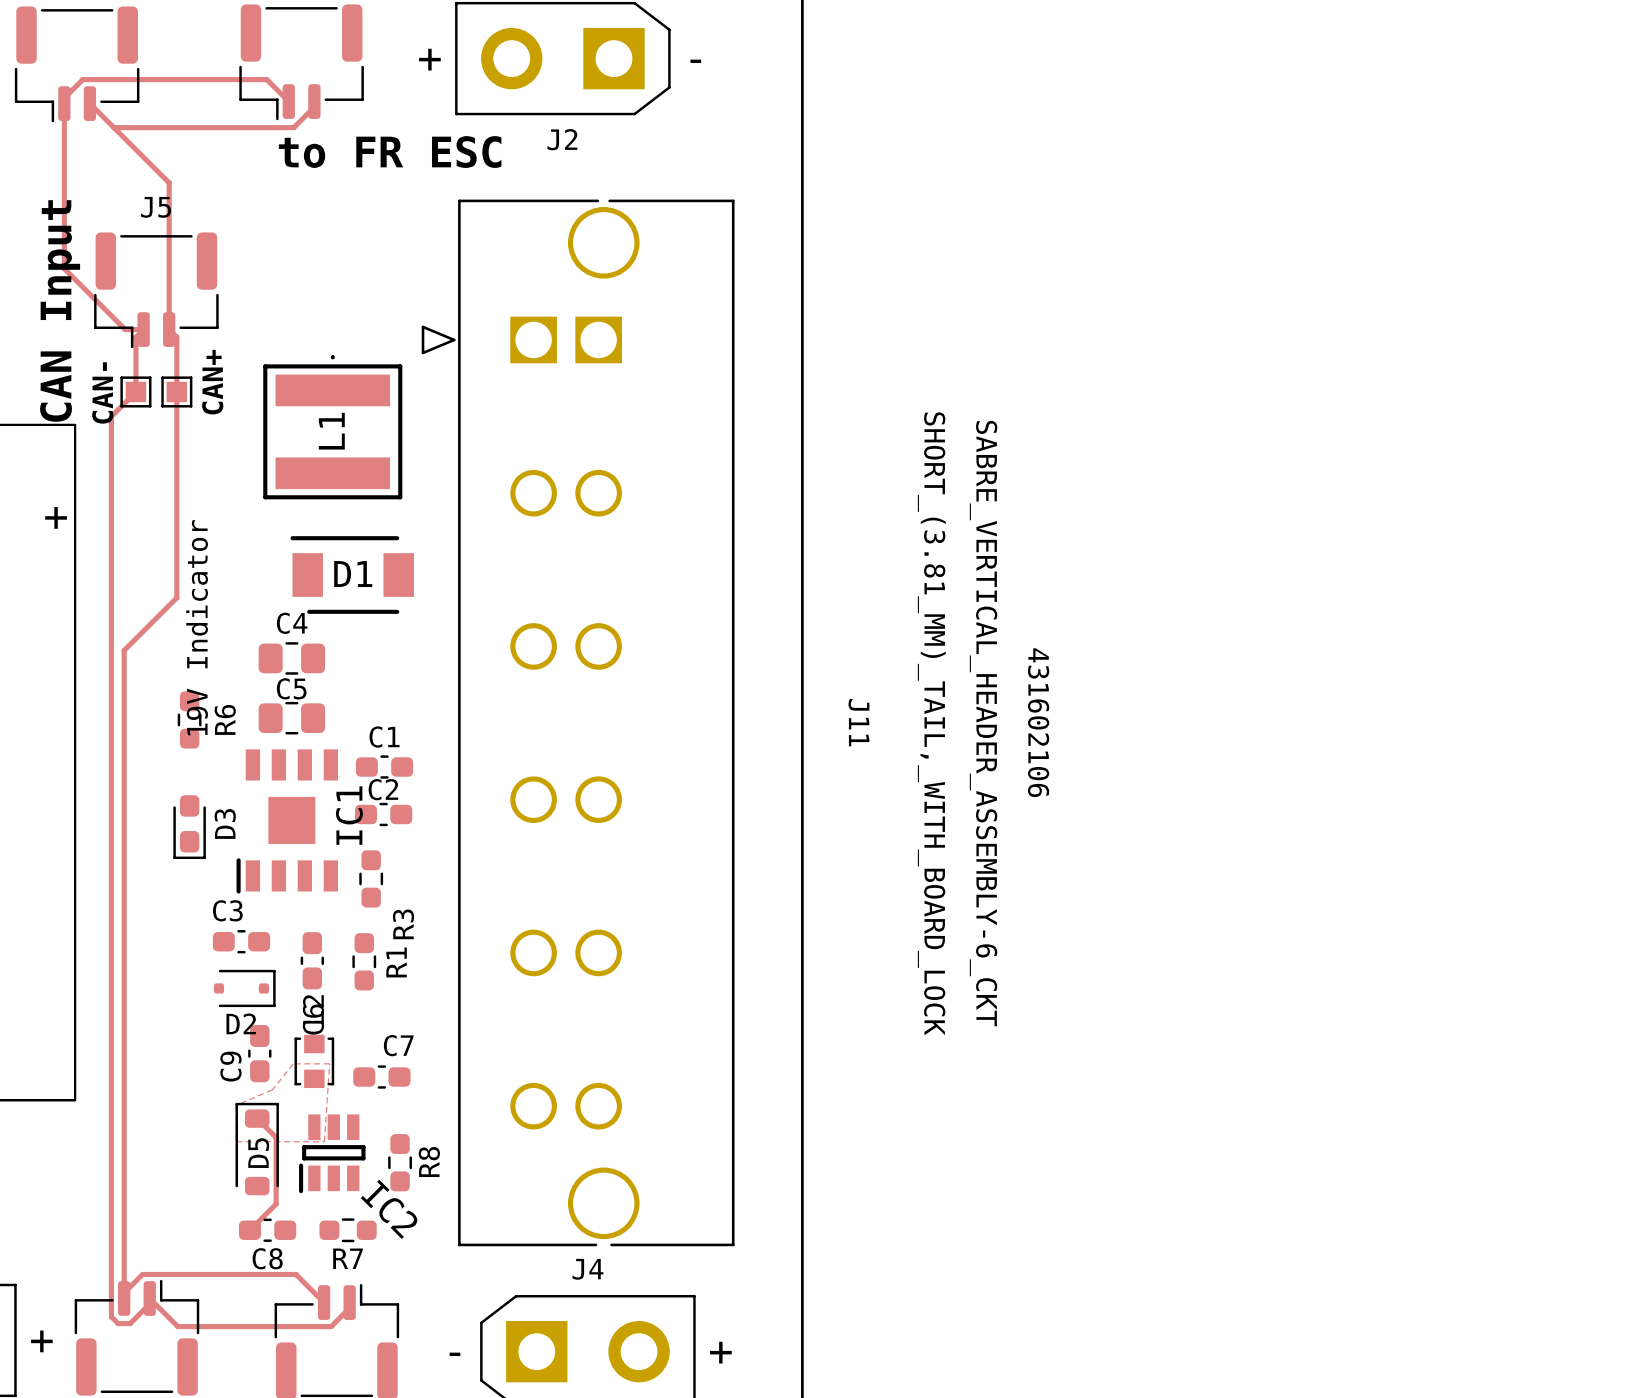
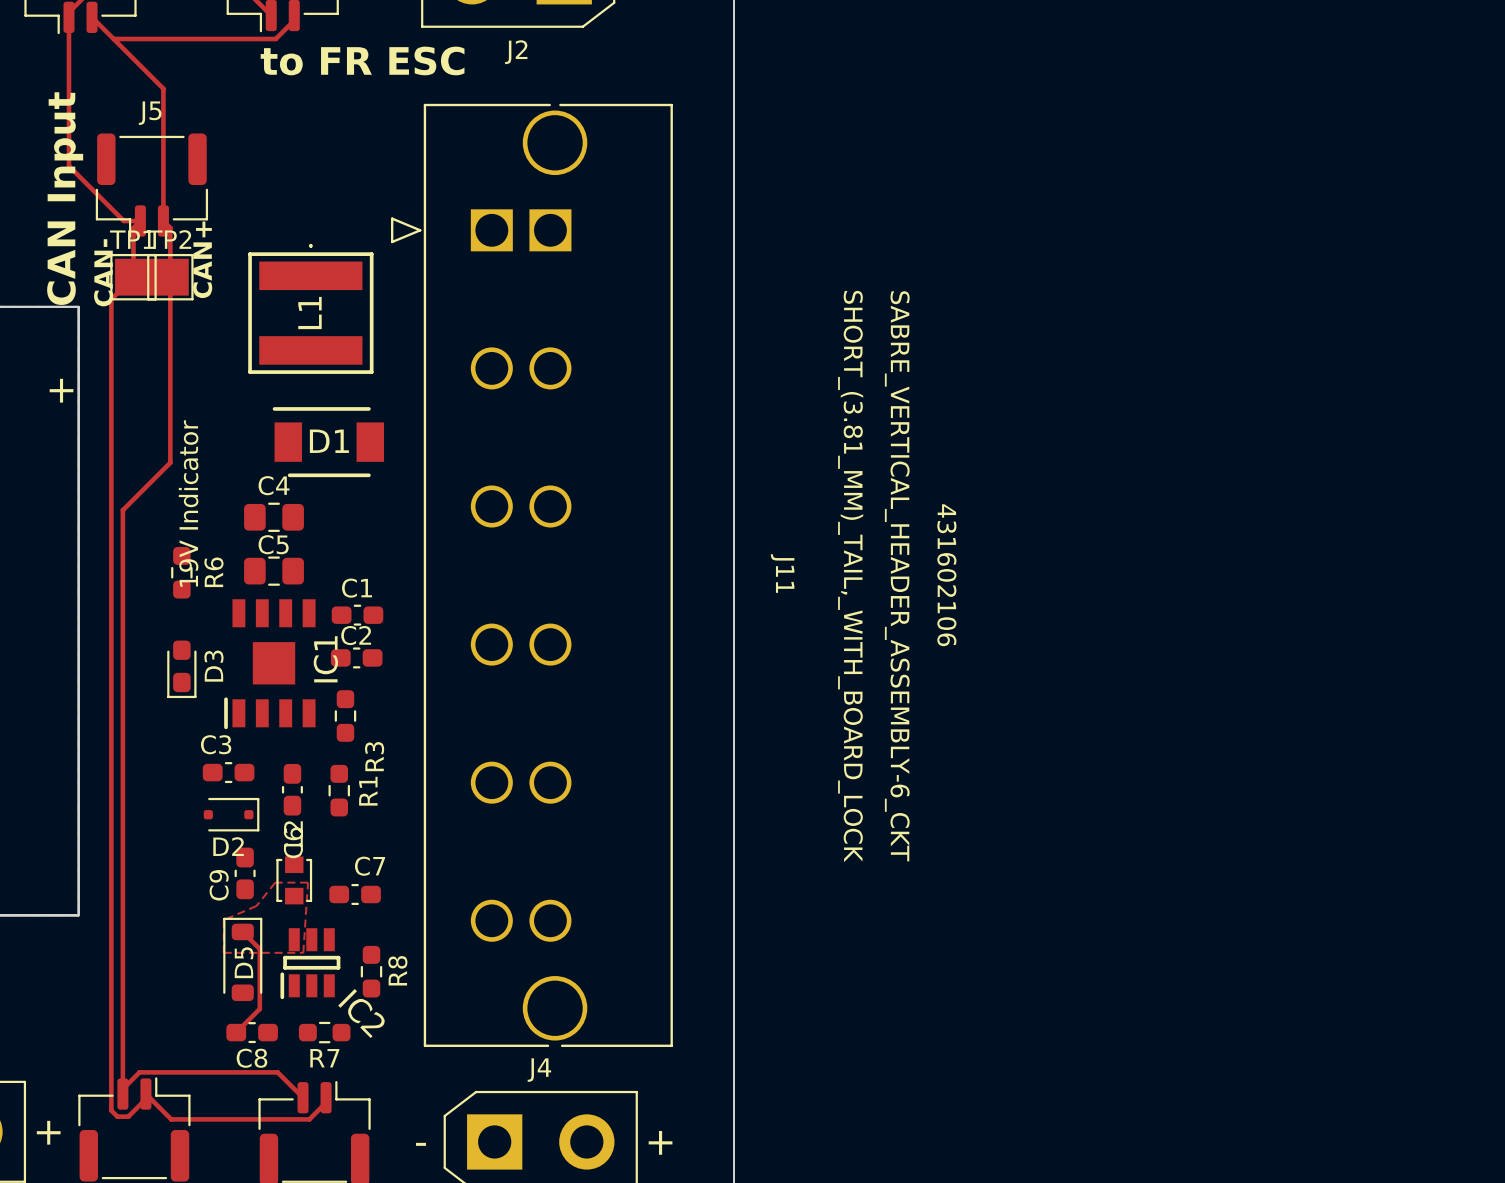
part: (135, 391) -> none
TP1: none -> (133, 277)
part: (176, 391) -> none
TP2: none -> (170, 277)

